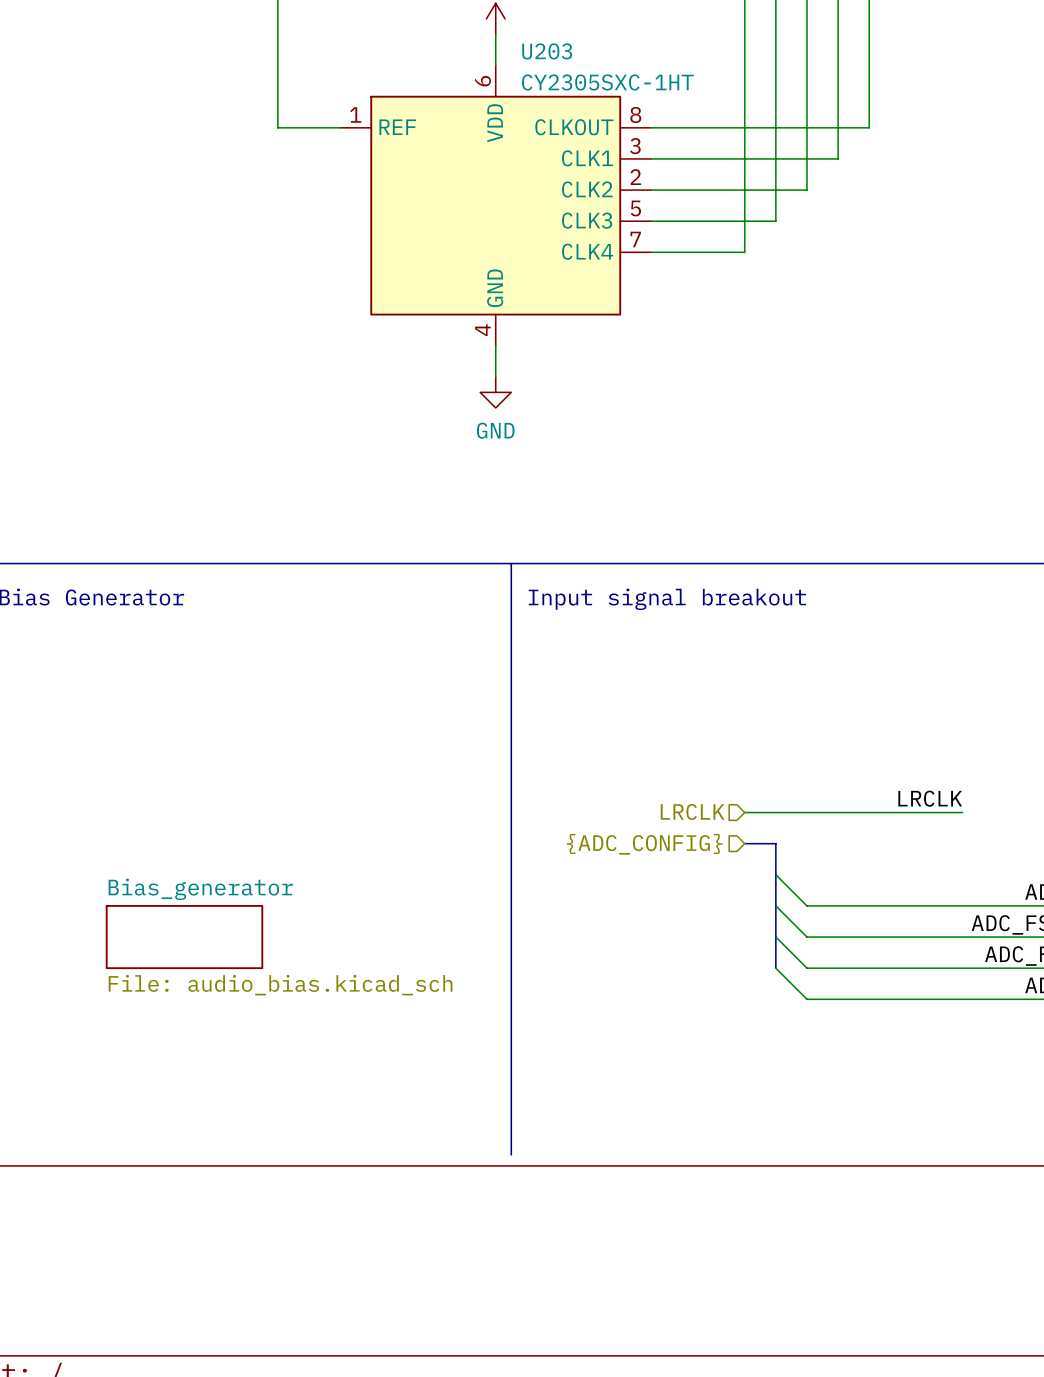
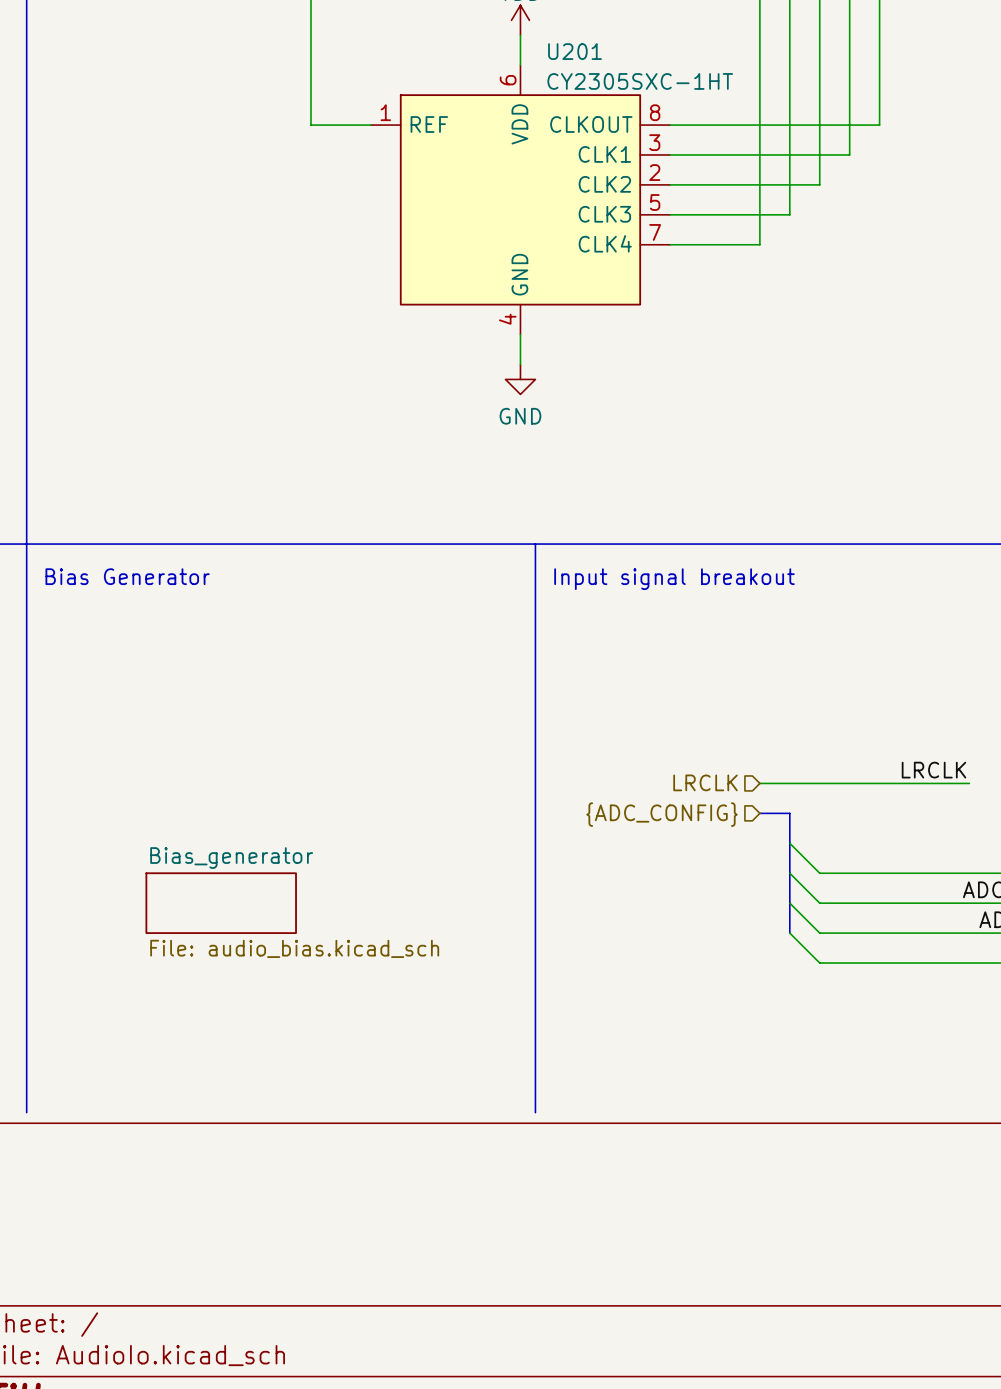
U203 name: U203 (547, 51) -> U201 (575, 51)

